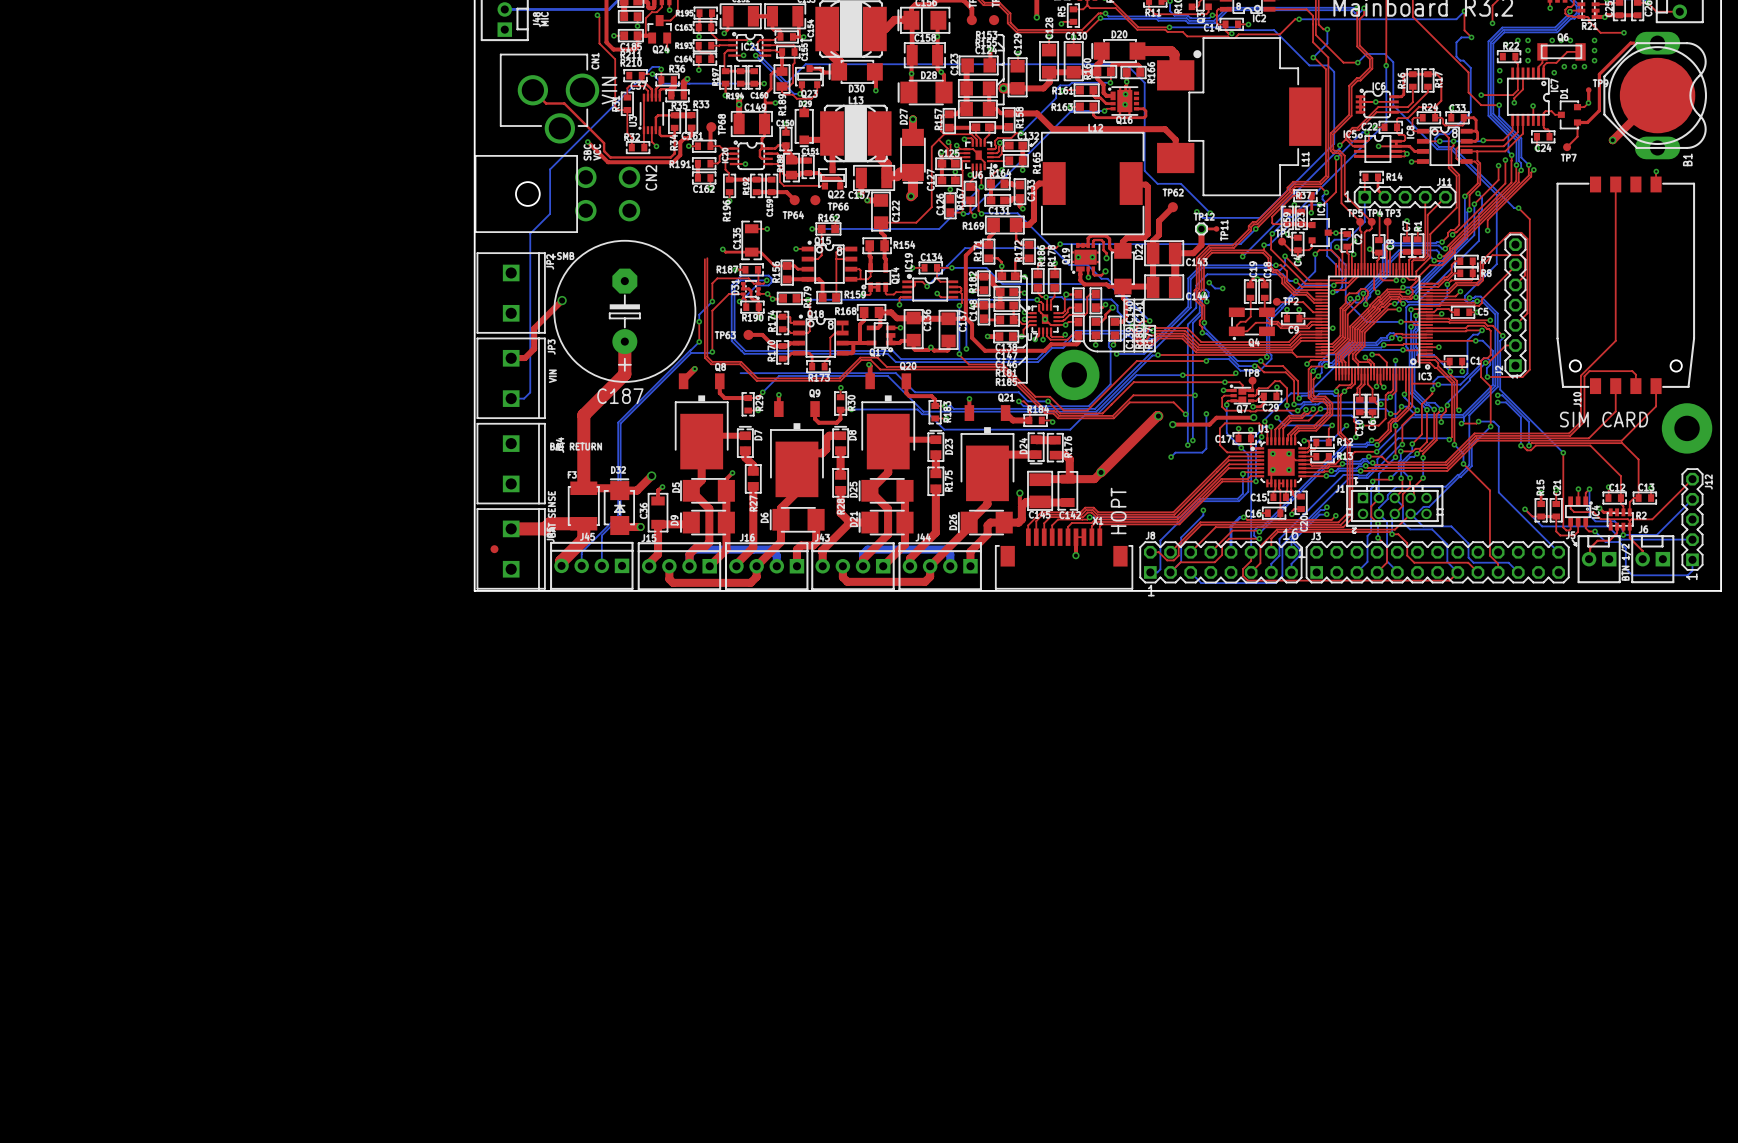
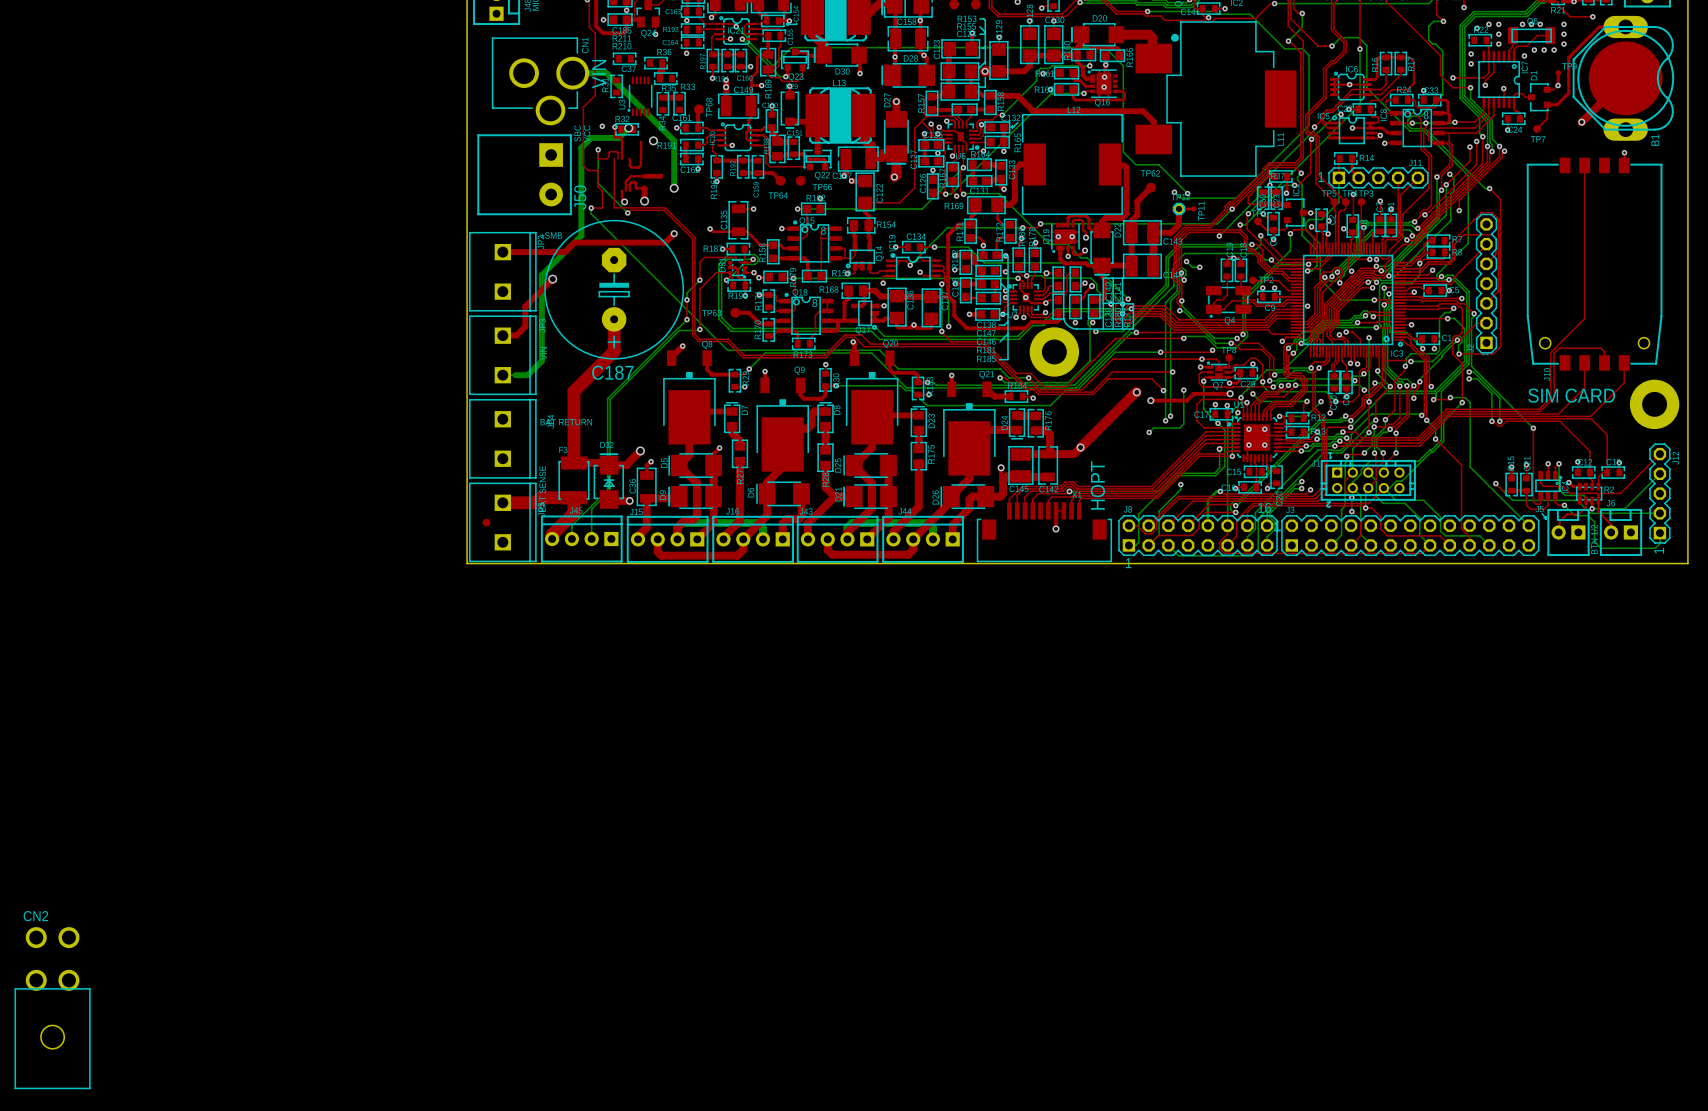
top track: (605, 49) (615, 59) (615, 106) (618, 110) (627, 110) (627, 133) (631, 137) (631, 147) -> (595, 33) (595, 95) (583, 107) (583, 165) (588, 170) (597, 171) (597, 186) (602, 191) (602, 207) (591, 208)
top track: (661, 69) (661, 83) (655, 89) (655, 97) -> none
bottom track: (661, 69) (658, 66) (652, 66) (550, 169) (550, 213) (530, 233) (530, 392) (524, 398) -> (628, 128) (618, 137) (591, 137) (581, 147) (581, 235) (541, 275) (541, 361) (527, 375) (515, 375)
via: (661, 69) -> none
top track: (652, 74) (641, 75) (641, 80) (651, 89) (651, 97) -> none
bottom track: (652, 74) (662, 83) (689, 83) -> none
via: (652, 74) -> none
top track: (687, 78) (683, 82) (683, 95) -> none
via: (687, 78) -> none
bottom track: (689, 83) (764, 83) -> none
top track: (671, 89) (661, 89) (659, 97) -> none
top track: (532, 90) (546, 103) (564, 103) (604, 143) (604, 151) (610, 157) (670, 157) (674, 153) (674, 127) -> none
bottom track: none -> (572, 73) (606, 73) (674, 140) (674, 188)
top track: (627, 97) (627, 88) (629, 86) (642, 86) (647, 90) (647, 97) -> none
top track: (643, 97) (644, 147) -> none
top track: (674, 115) (658, 115) (655, 117) (655, 130) -> none
top track: (691, 127) (691, 135) (680, 142) (680, 155) (673, 162) (608, 162) (587, 142) -> none
top track: (651, 130) (651, 141) (656, 146) -> none
top track: (659, 130) (661, 136) (674, 134) -> none
via: (587, 142) -> none
via: none -> (602, 126)
top track: none -> (614, 127) (614, 137) (621, 138) (621, 158)
via: none -> (614, 127)
via: none -> (628, 128)
via: (656, 146) -> none
via: none -> (653, 140)
top track: none -> (641, 141) (640, 165) (638, 167) (631, 167) (629, 158)
top track: none -> (598, 149) (597, 158) (606, 158) (610, 151) (616, 151) (618, 158)
bottom track: none -> (598, 149) (598, 183) (627, 212)
via: none -> (598, 149)
top track: none -> (614, 158) (614, 207) (665, 207) (694, 237)
J50: none -> (524, 174)
CN2 rotation: 0° (557, 194) -> 90° counterclockwise (52, 1008)
CN2 position: (557, 194) -> (52, 1008)
top track: none -> (660, 176) (630, 176) (625, 181) (625, 190)
via: none -> (674, 188)
top track: none -> (621, 190) (621, 199) (624, 201)
top track: none -> (629, 190) (631, 182) (635, 183) (636, 188) (644, 188) (644, 201)
via: none -> (644, 201)
via: none -> (624, 201)
bottom track: none -> (591, 208) (591, 213) (727, 350)
via: none -> (591, 208)
top track: none -> (627, 212) (630, 210) (664, 210) (692, 238)
via: none -> (627, 212)
top track: none -> (674, 233) (665, 242) (574, 242) (565, 252) (502, 252)
via: none -> (674, 233)

